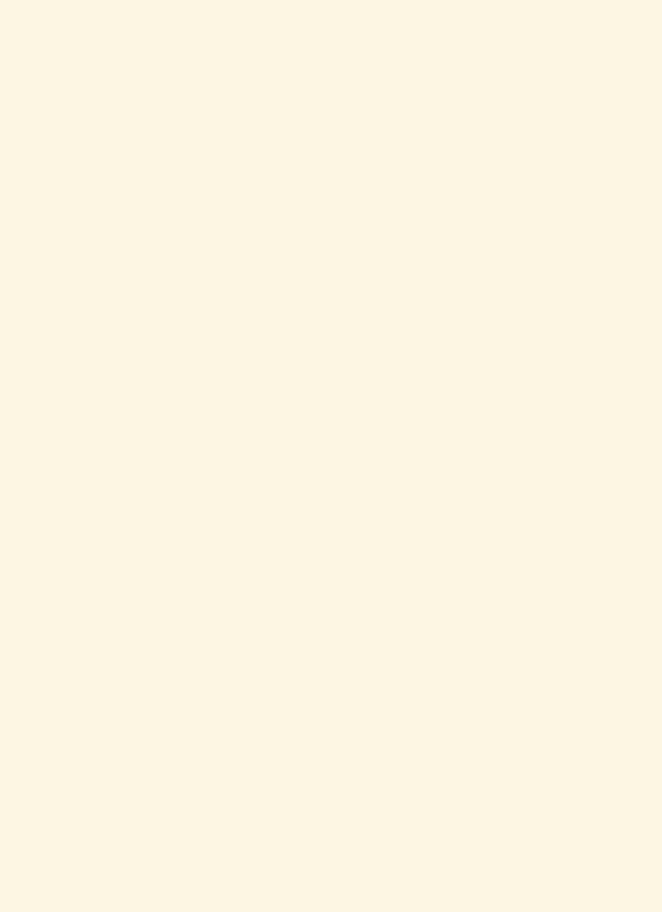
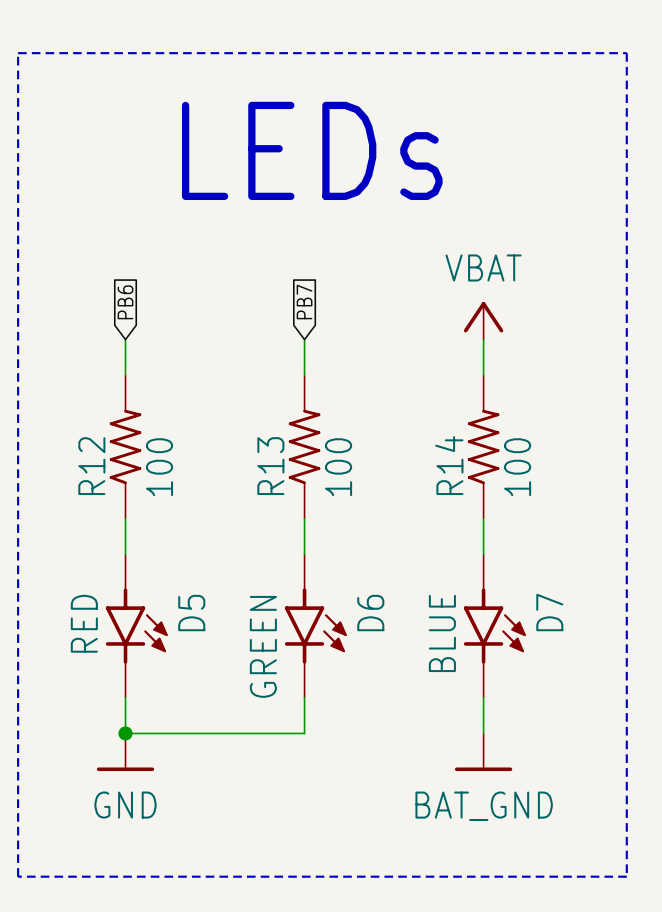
line: none -> (18, 53) (18, 876) (626, 876) (626, 53) (18, 53)
text: none -> LEDs (312, 150)
global label: none -> PB6 (125, 302)
global label: none -> PB7 (304, 302)
power symbol: none -> VBAT (483, 320)
wire: none -> (125, 339) (125, 375)
wire: none -> (304, 339) (304, 375)
wire: none -> (483, 339) (483, 375)
R12: none -> 100 (125, 447)
R13: none -> 100 (304, 447)
R14: none -> 100 (483, 447)
wire: none -> (125, 518) (125, 554)
wire: none -> (304, 518) (304, 554)
wire: none -> (483, 518) (483, 554)
D5: none -> RED (136, 626)
D6: none -> GREEN (315, 626)
D7: none -> BLUE (494, 626)
wire: none -> (125, 697) (125, 733) (304, 733) (304, 697)
wire: none -> (483, 697) (483, 733)
junction: none -> (125, 733)
power symbol: none -> GND (125, 752)
power symbol: none -> BAT_GND (483, 752)

